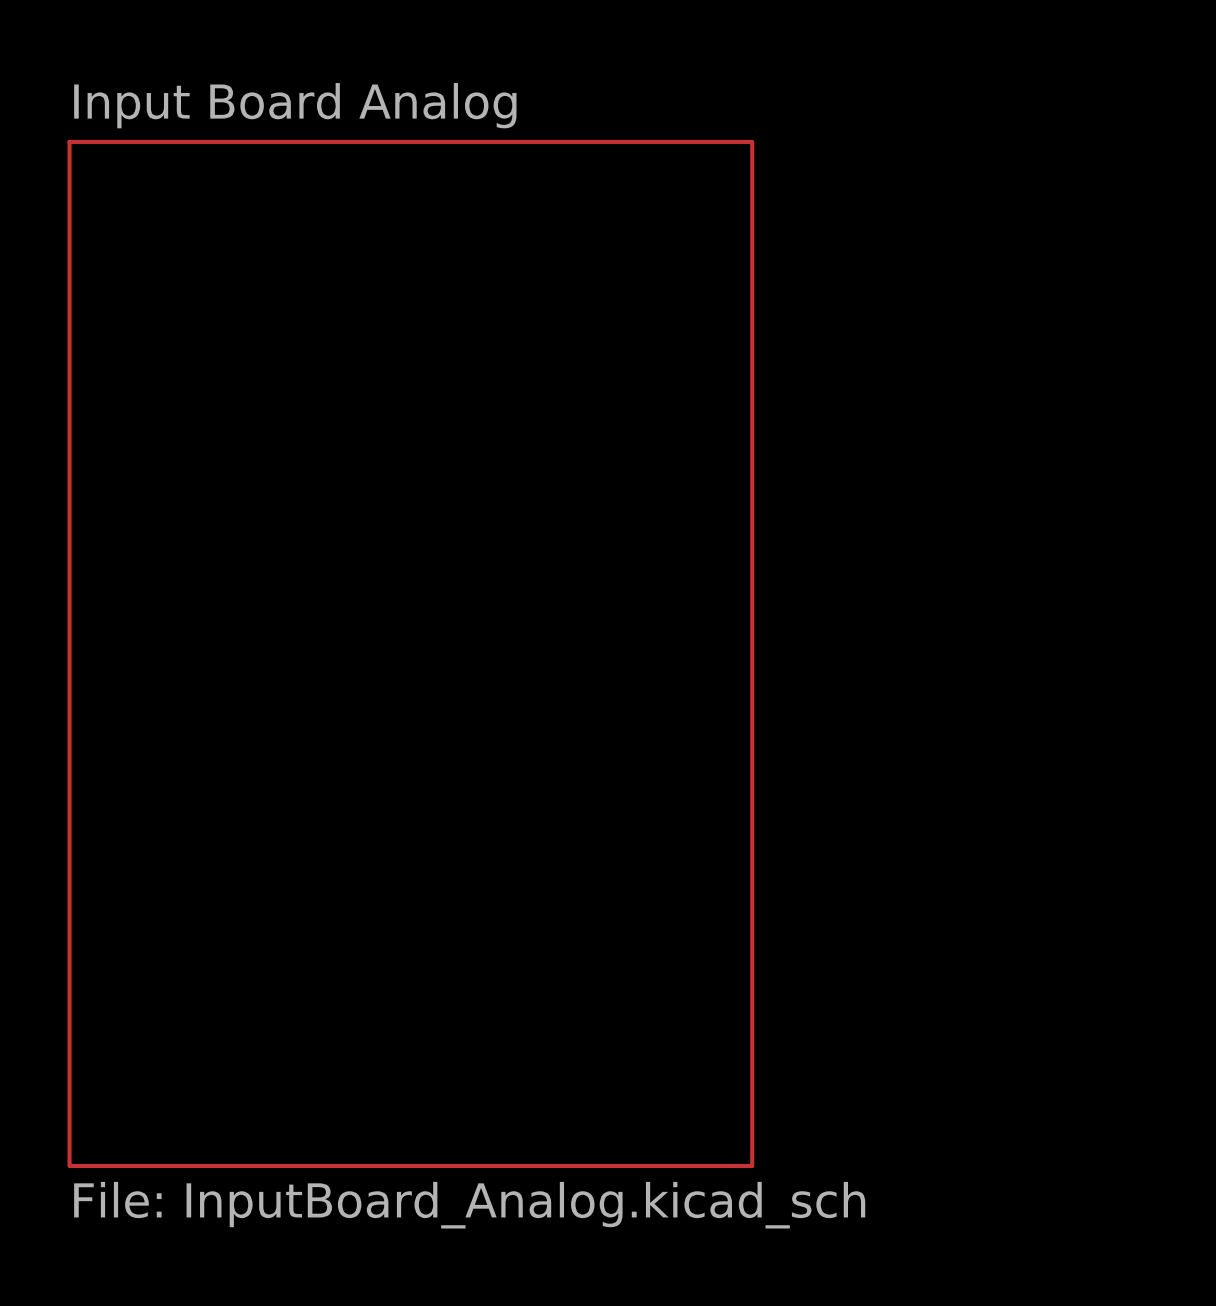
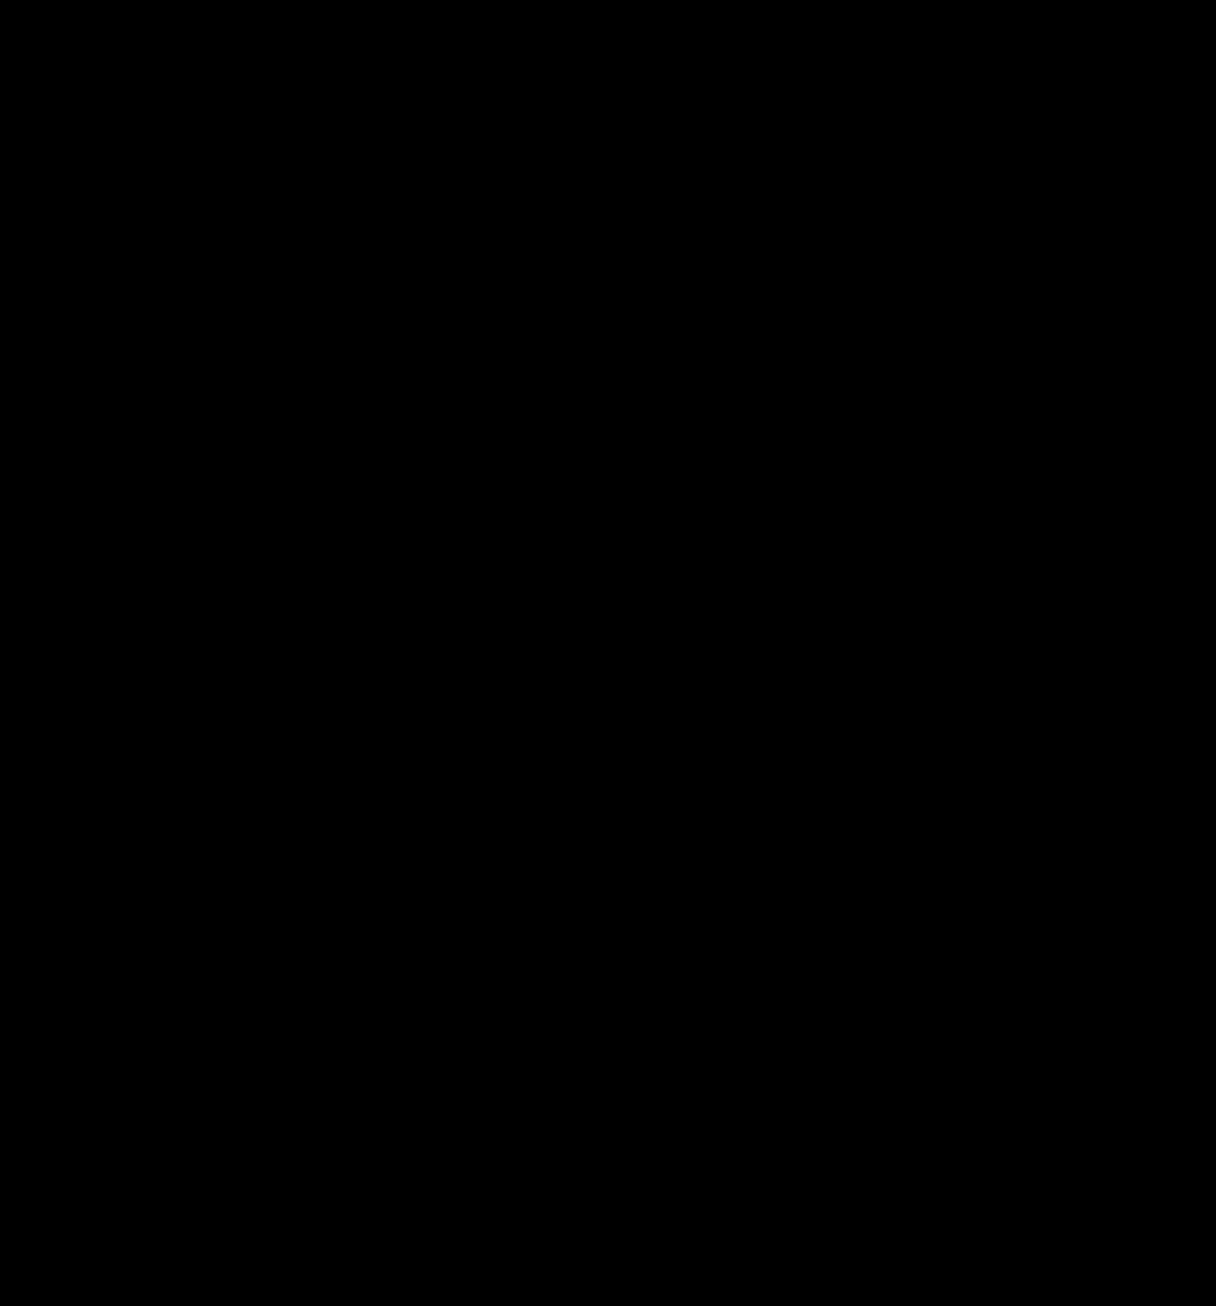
sheet Input Board Analog: File: InputBoard_Analog.kicad_sch (410, 653) -> none

